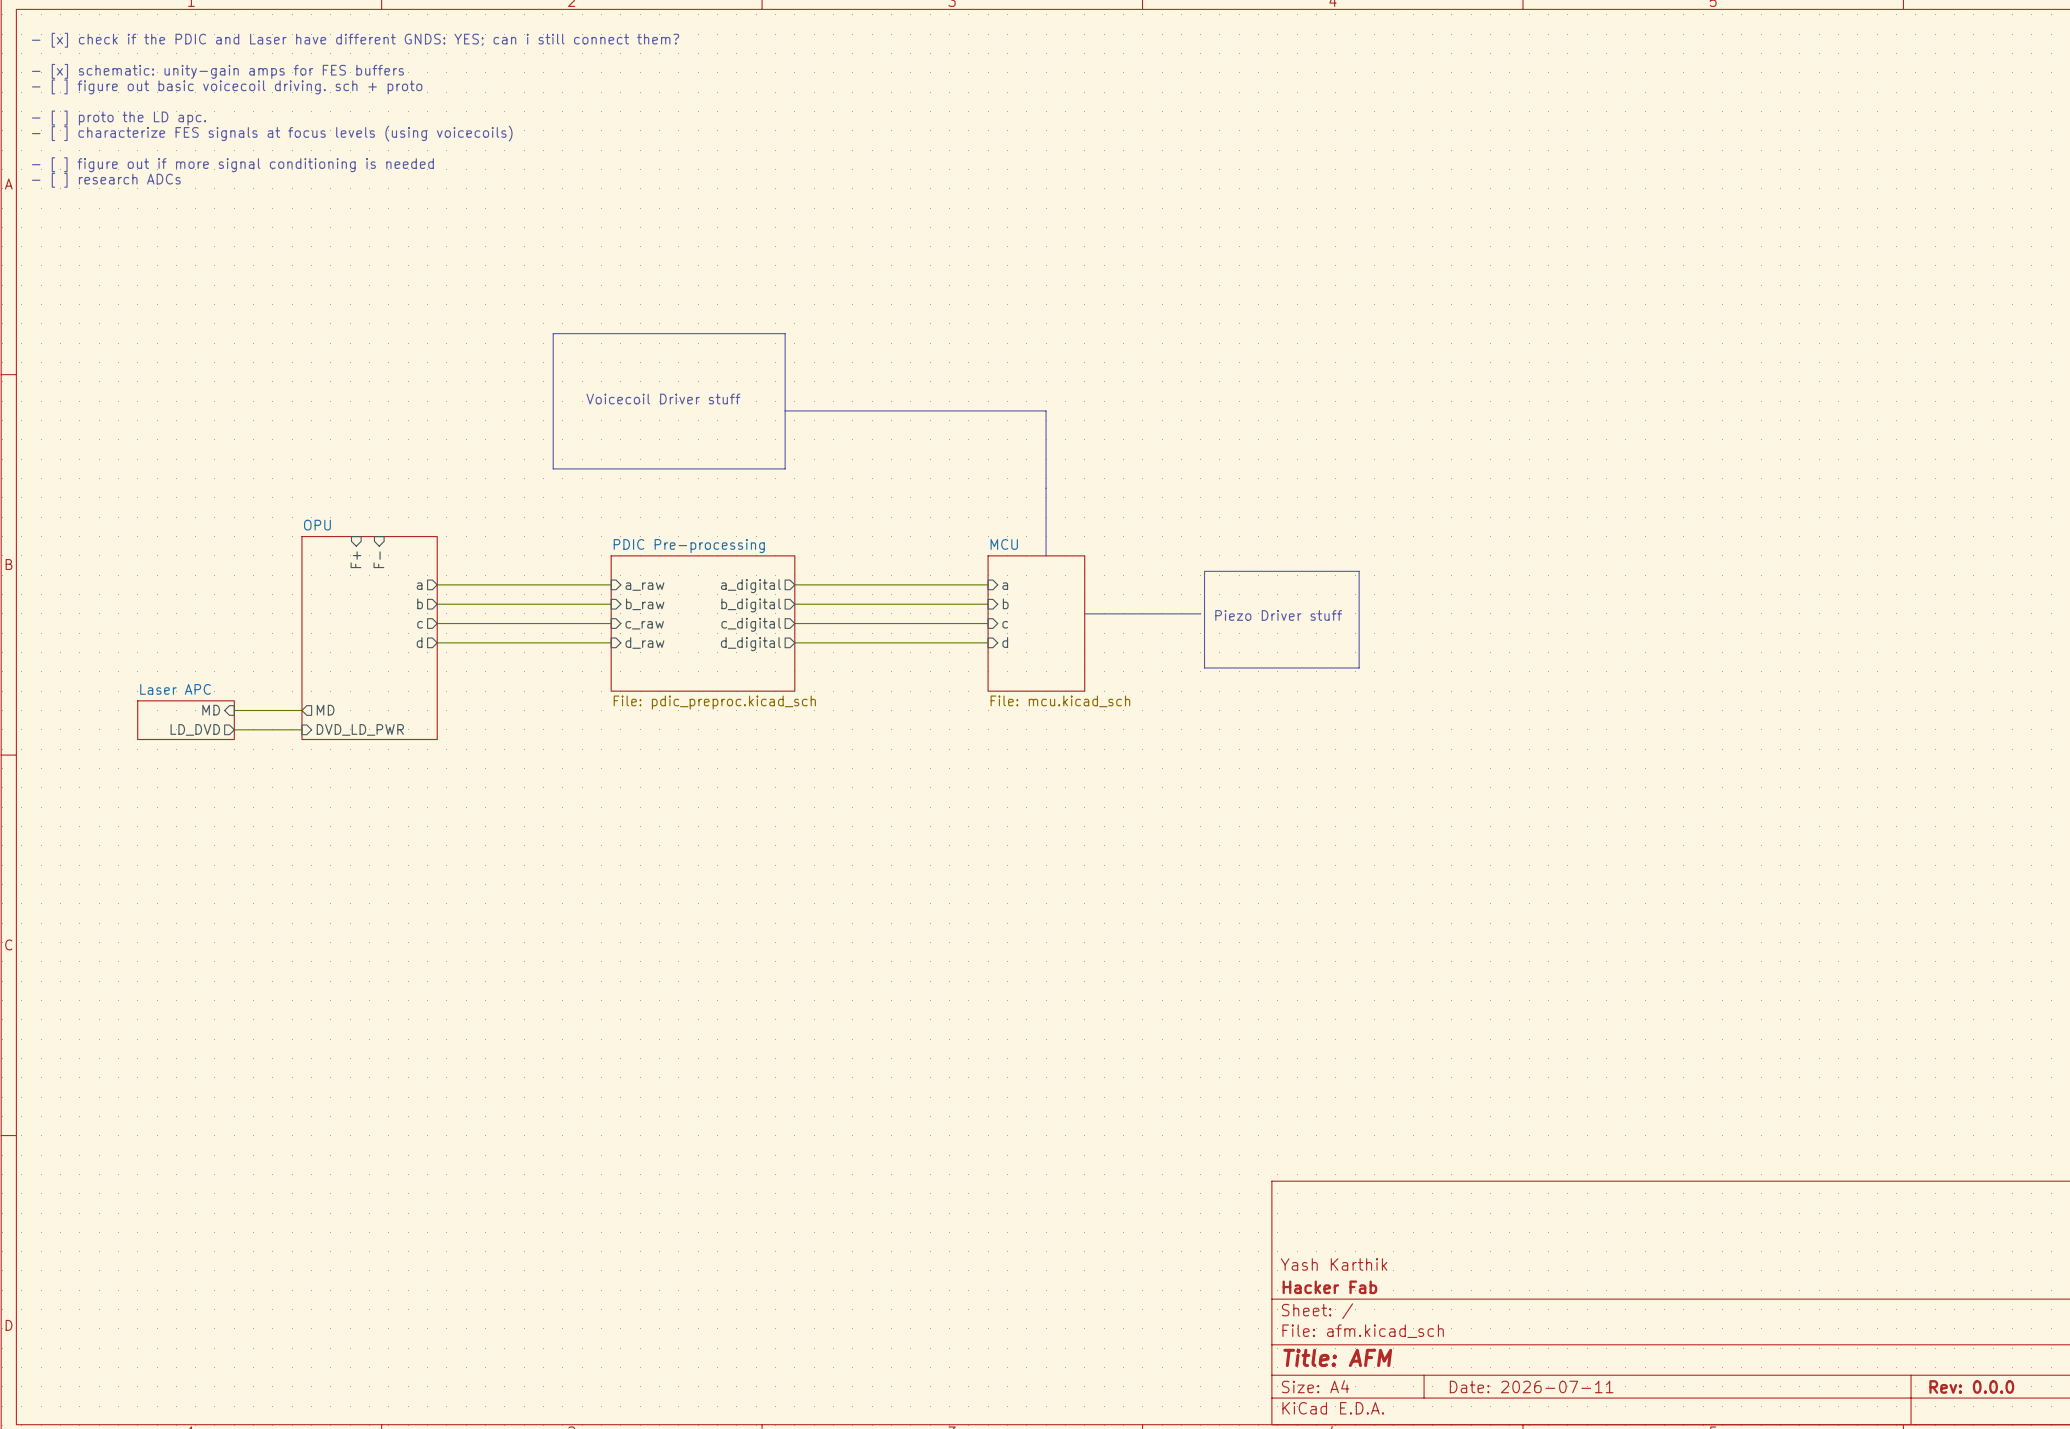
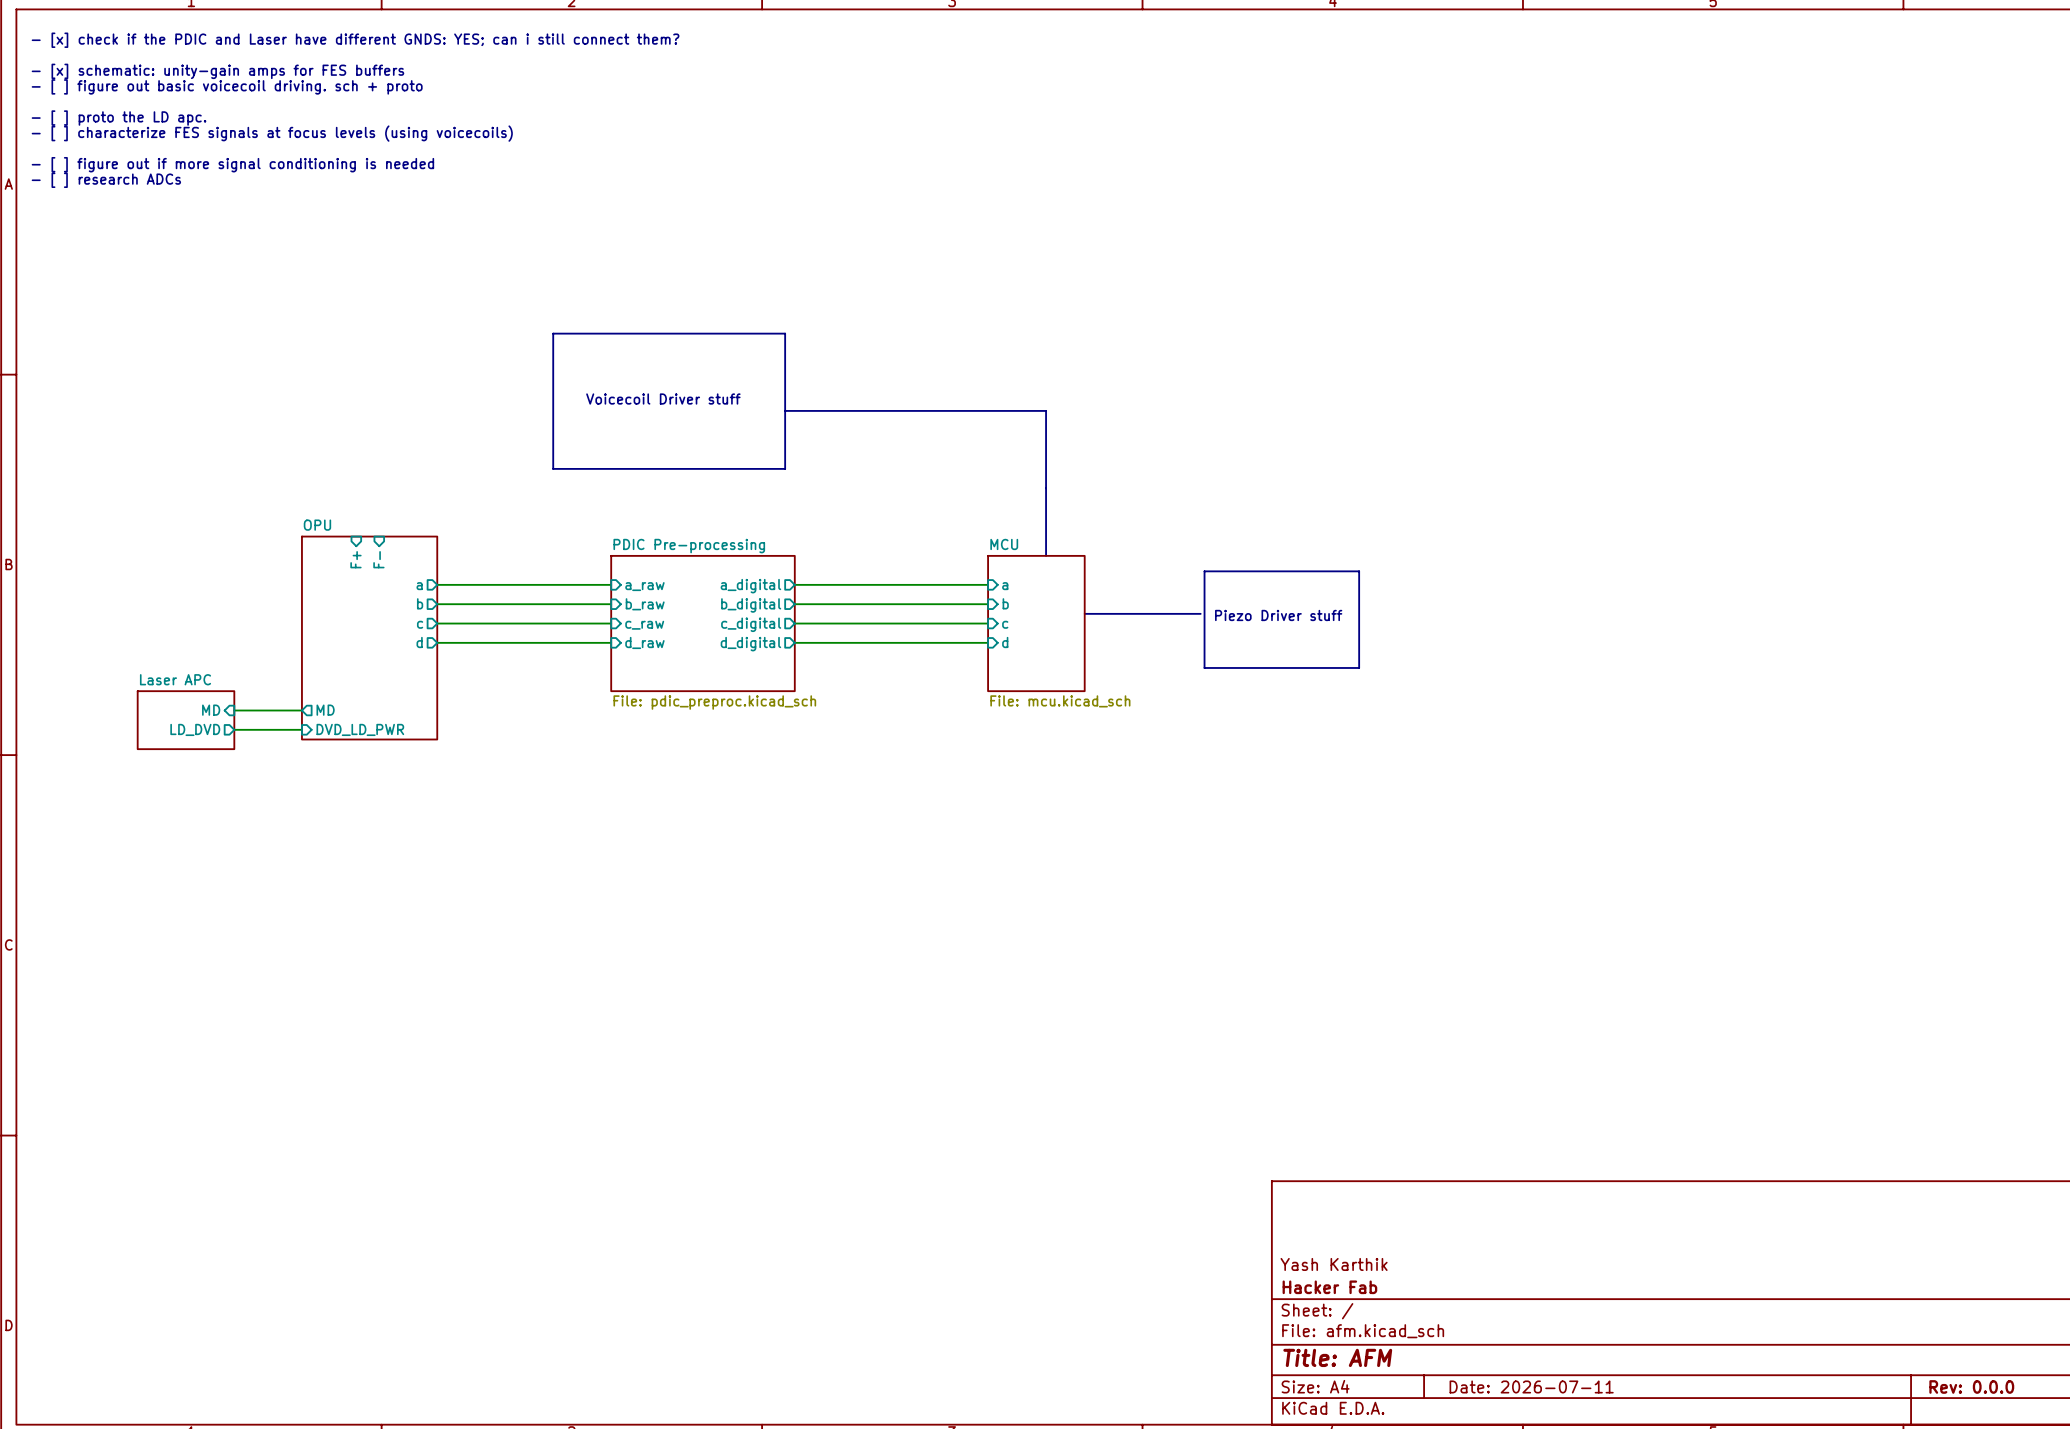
sheet Laser APC shape: [137, 700, 235, 741] -> [137, 690, 235, 750]

